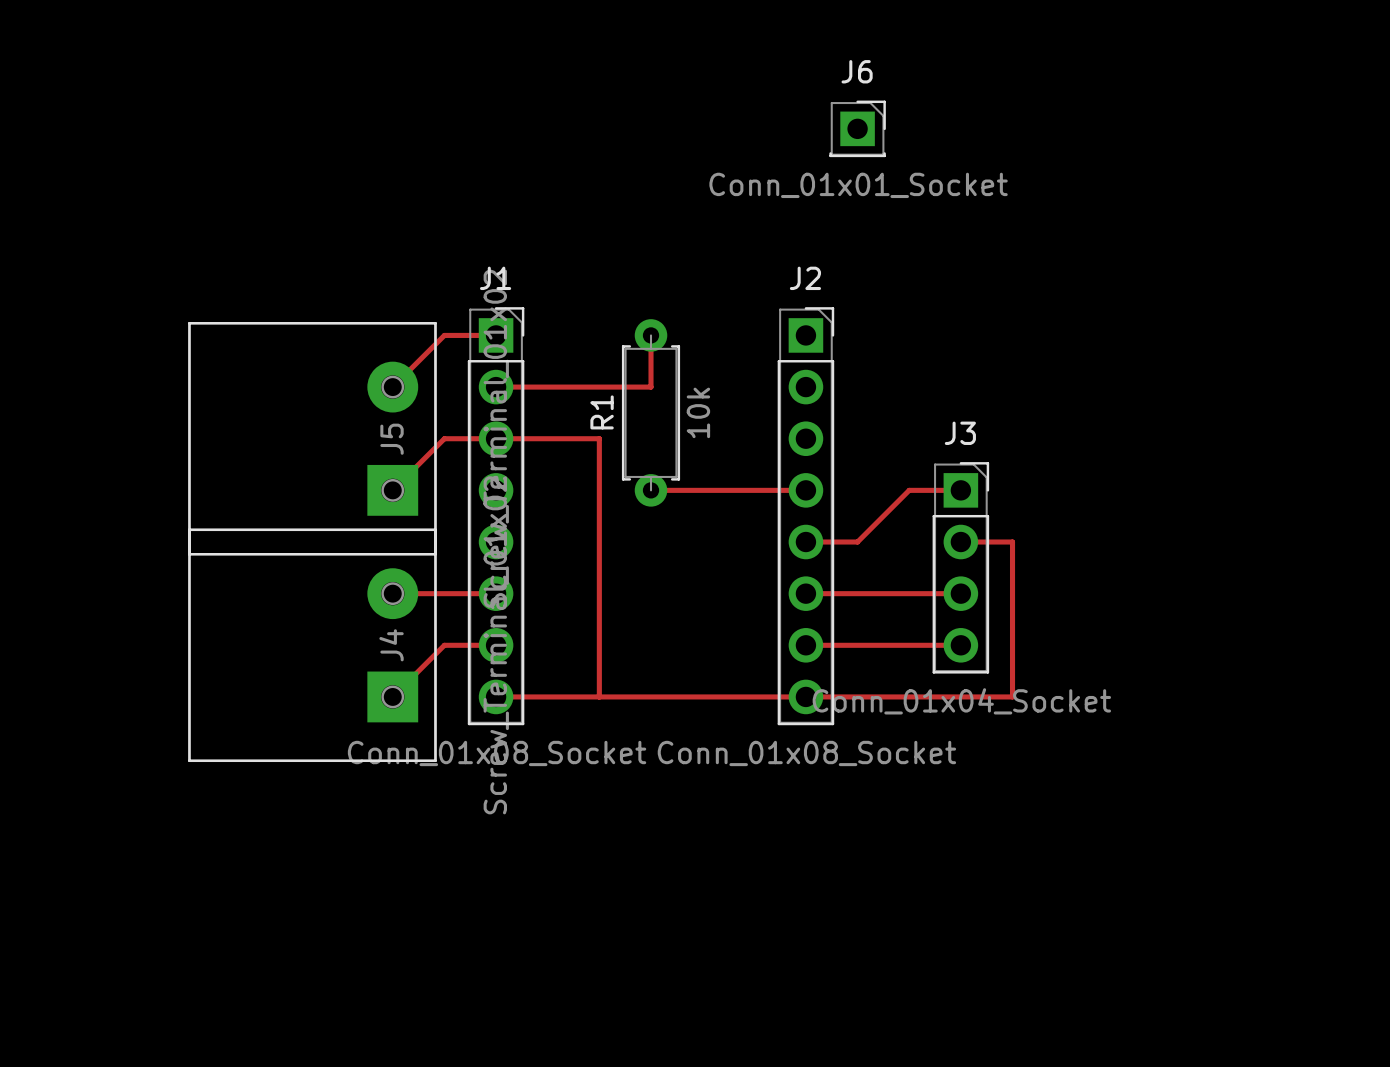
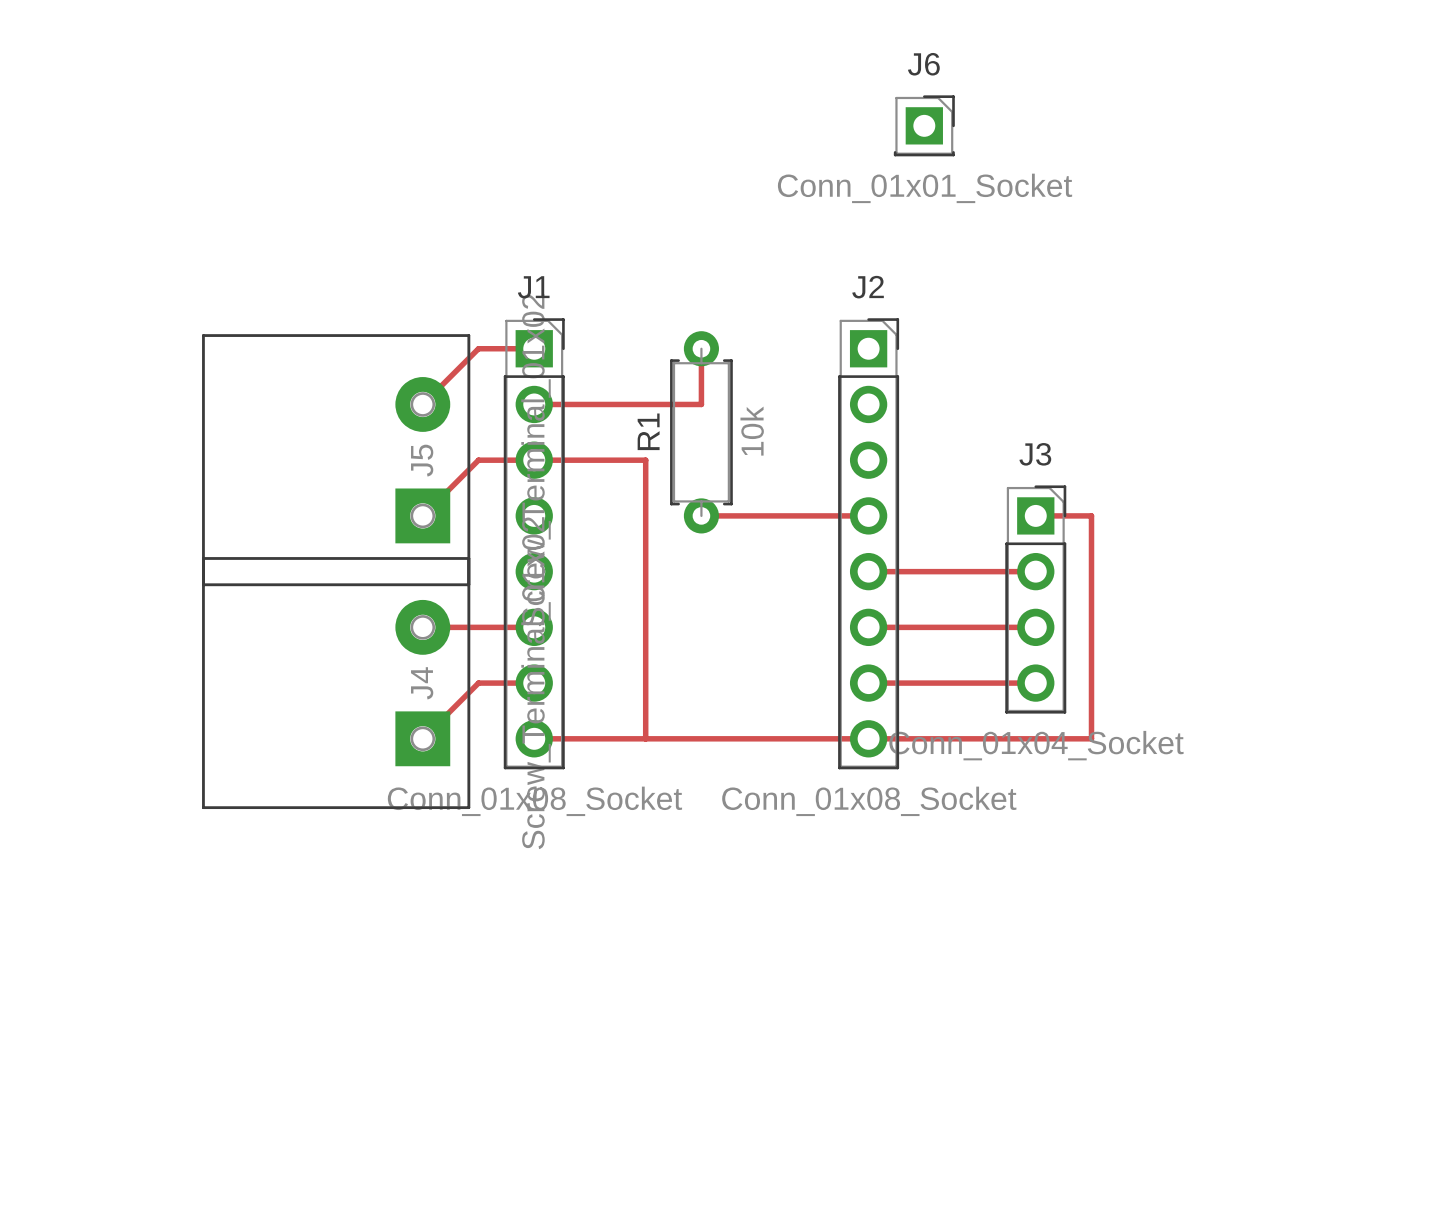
top track: (960, 490) (909, 490) (857, 542) -> (1035, 571) (924, 571)
top track: (960, 542) (1012, 542) -> (1035, 515) (1091, 515) (1091, 571)

